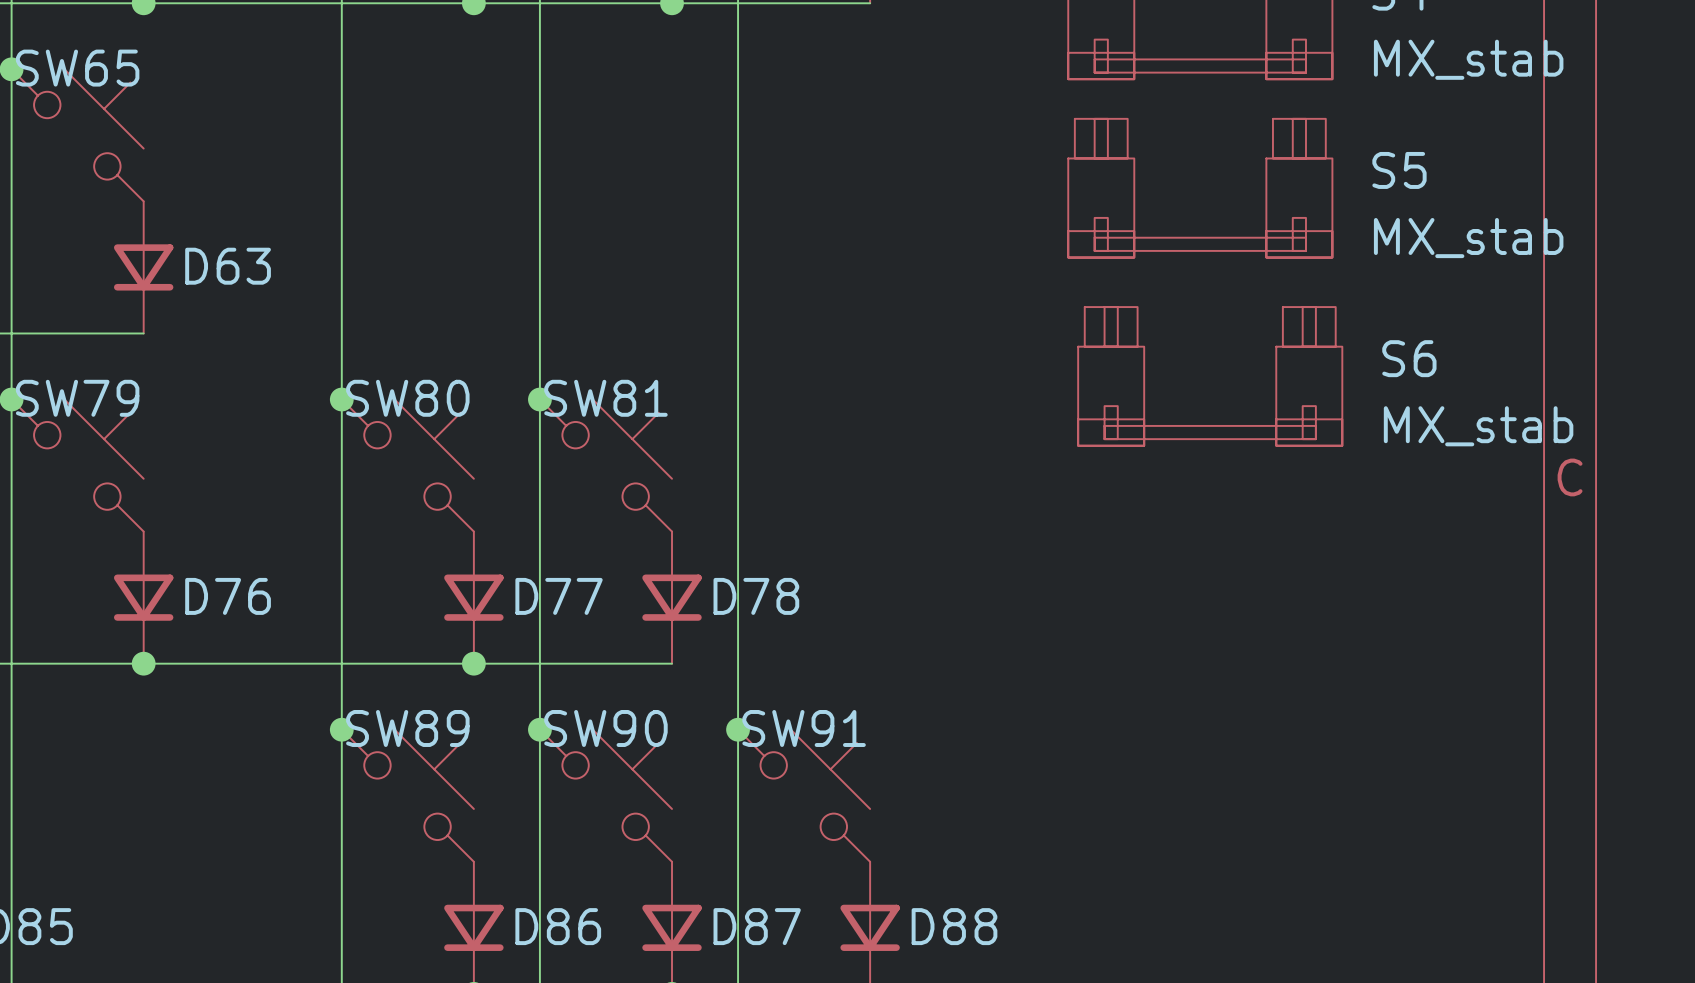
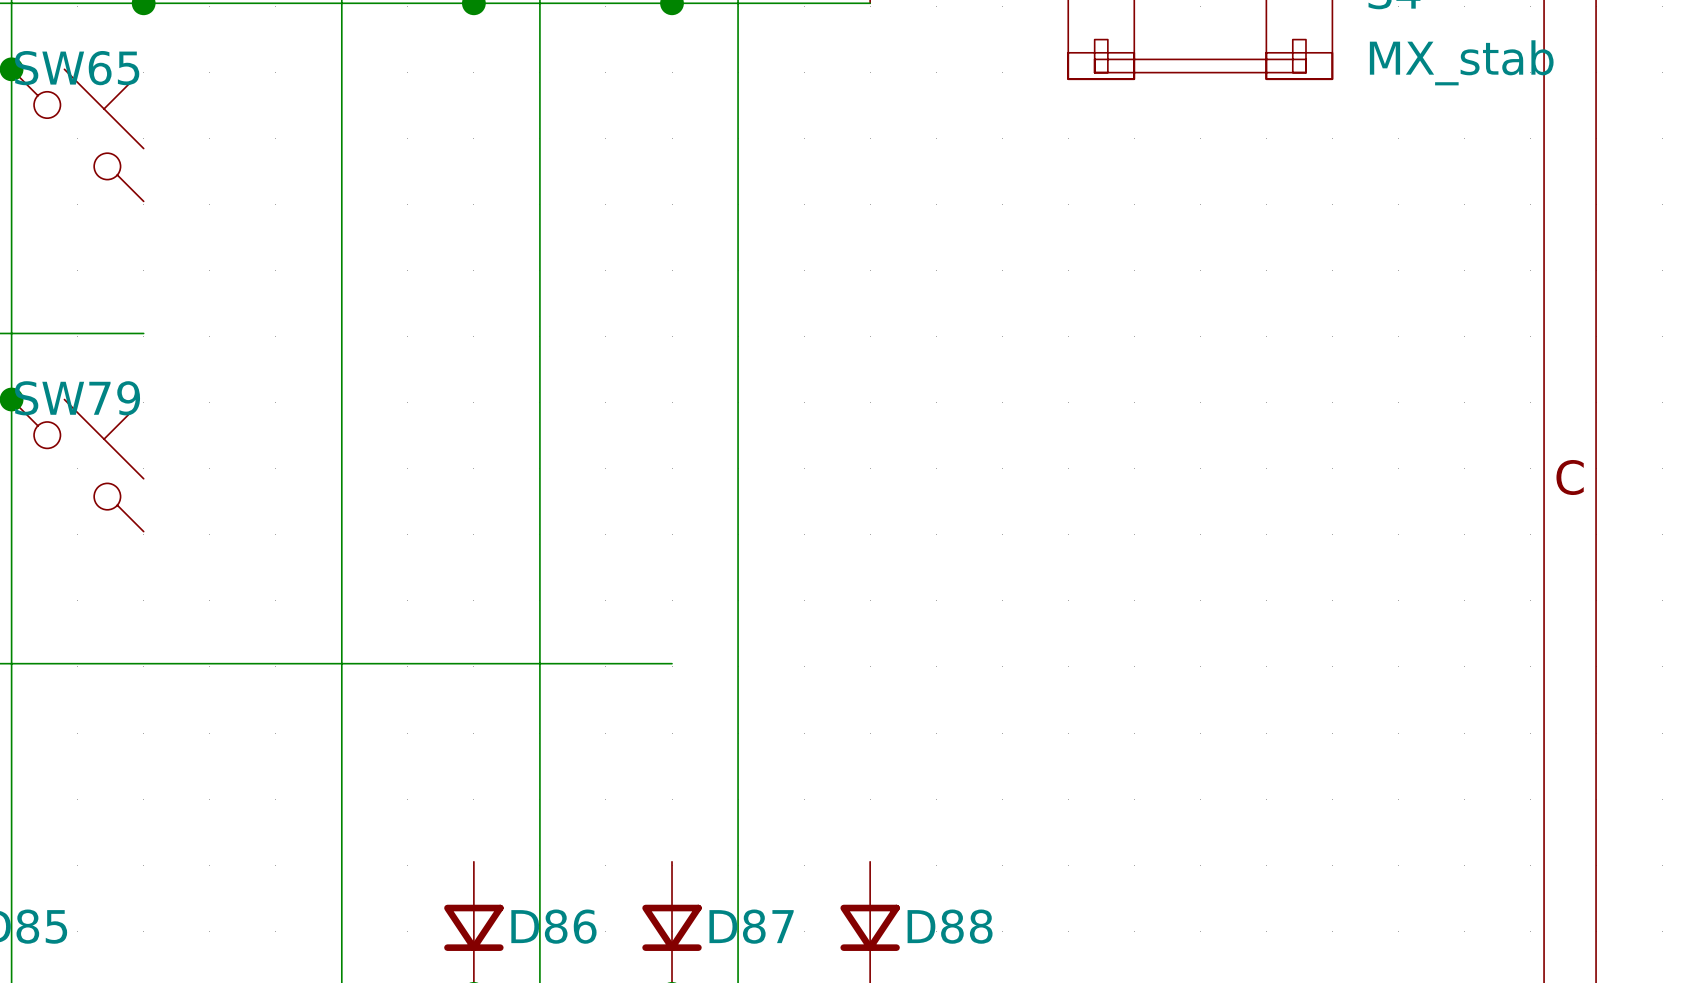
S5: MX_stab (1200, 188) -> none
D63: (143, 267) -> none
S6: MX_stab (1210, 376) -> none
junction: (341, 399) -> none
junction: (539, 399) -> none
SW80: (407, 465) -> none
SW81: (605, 465) -> none
D76: (143, 597) -> none
D77: (473, 597) -> none
D78: (672, 597) -> none
junction: (143, 663) -> none
junction: (473, 663) -> none
junction: (341, 729) -> none
junction: (539, 729) -> none
junction: (738, 729) -> none
SW89: (407, 795) -> none
SW90: (605, 795) -> none
SW91: (804, 795) -> none

